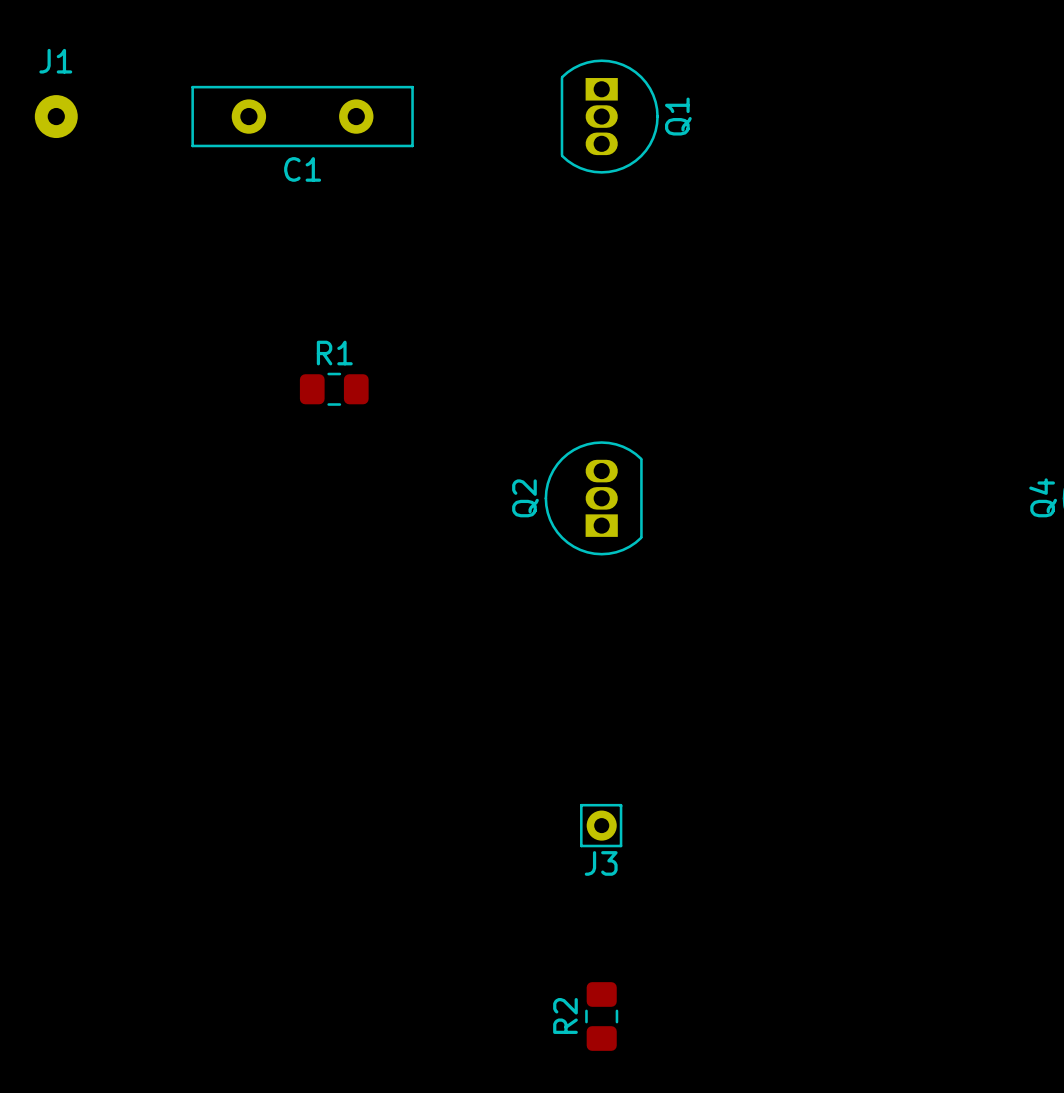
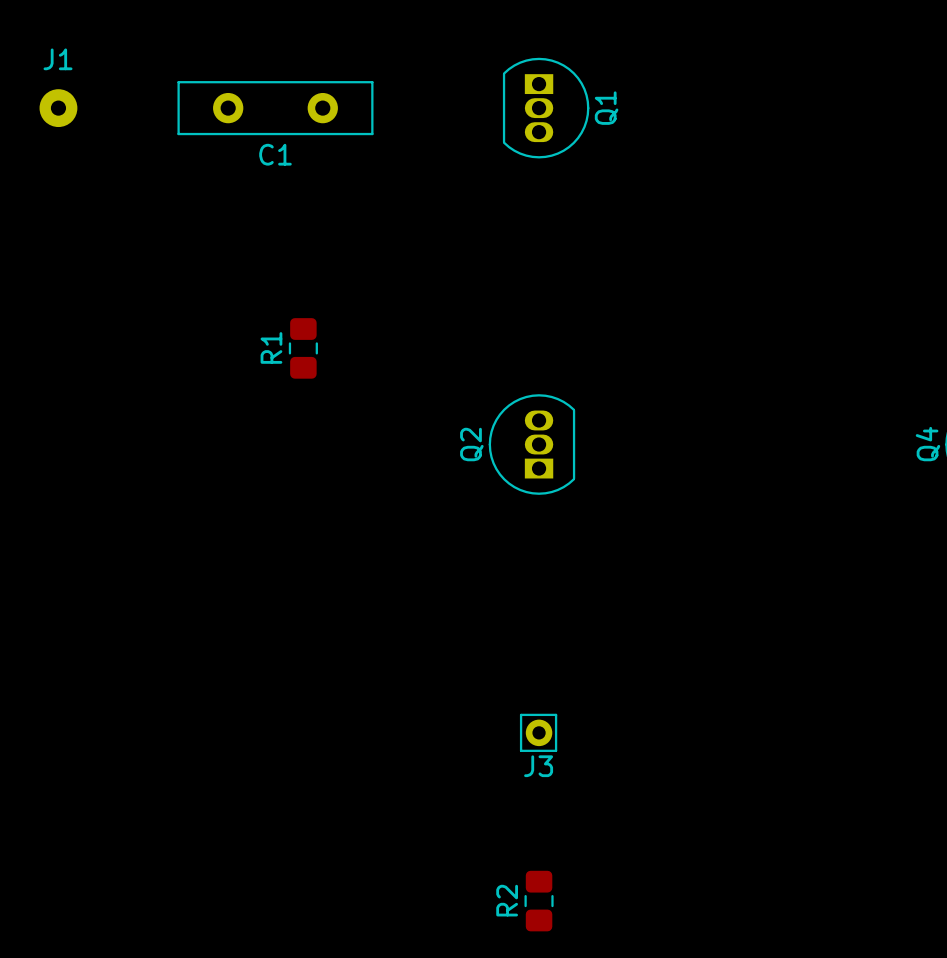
R1 name position: R1 (334, 353) -> R1 (271, 347)
R1 rotation: 0° (334, 389) -> 90° clockwise (303, 348)

